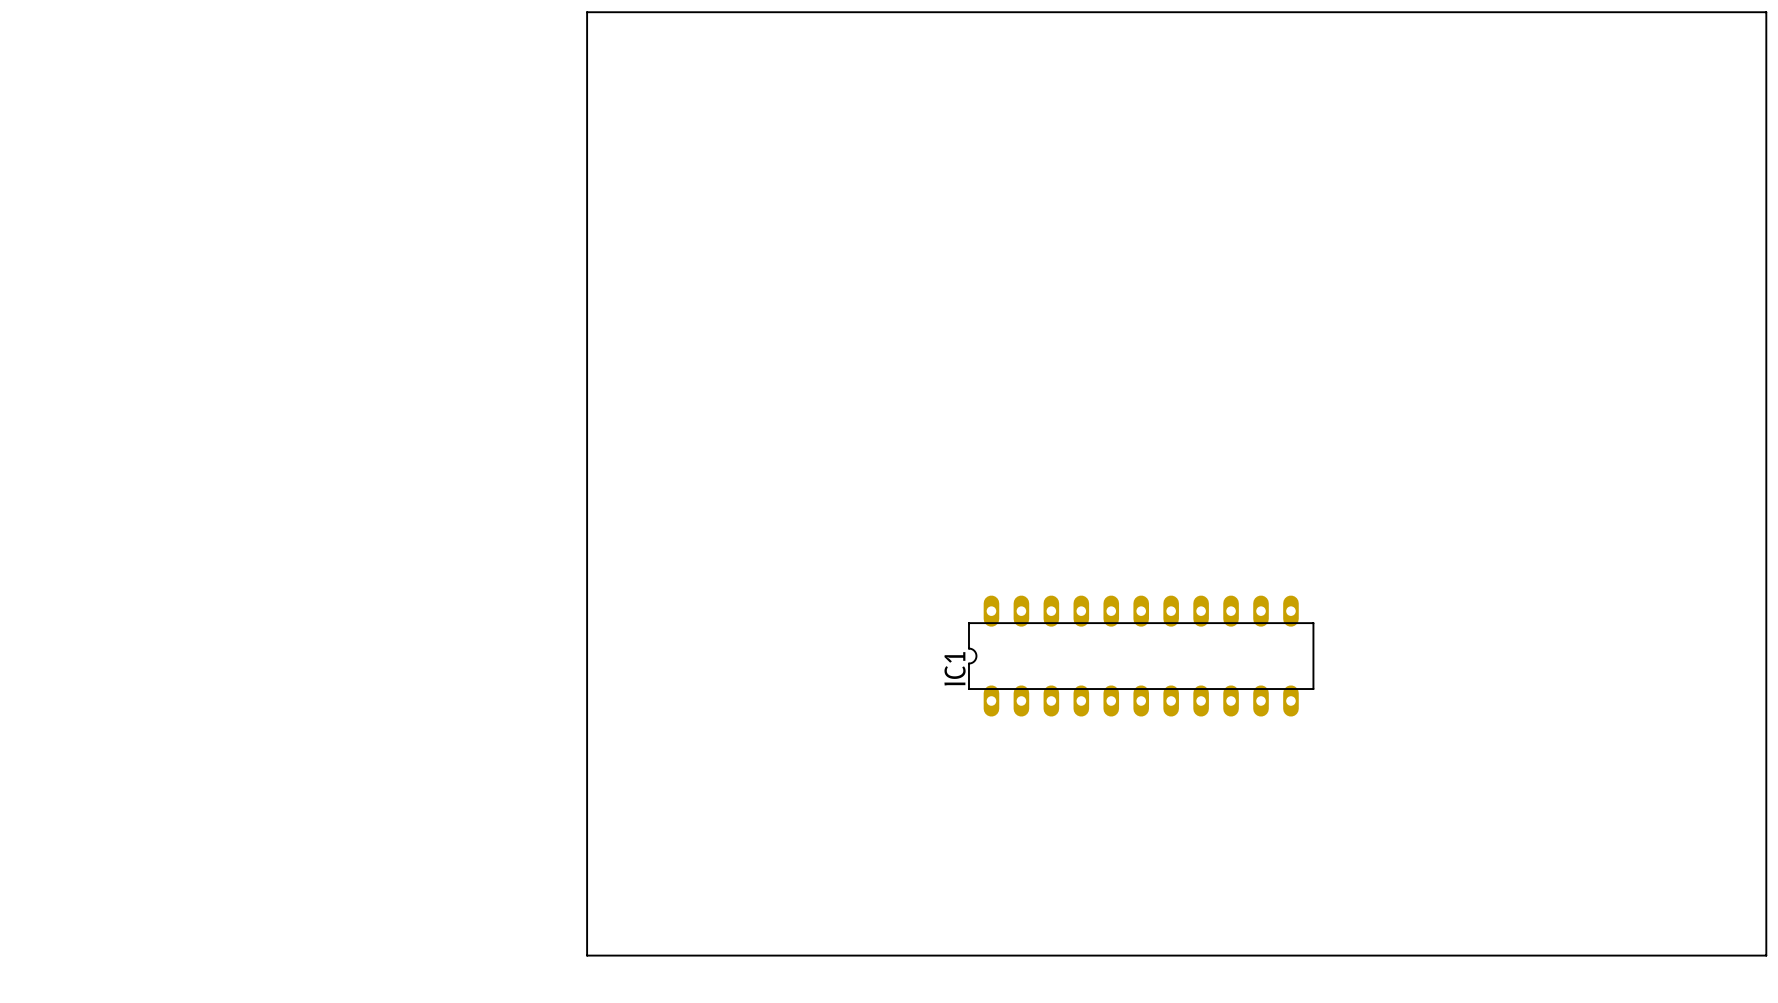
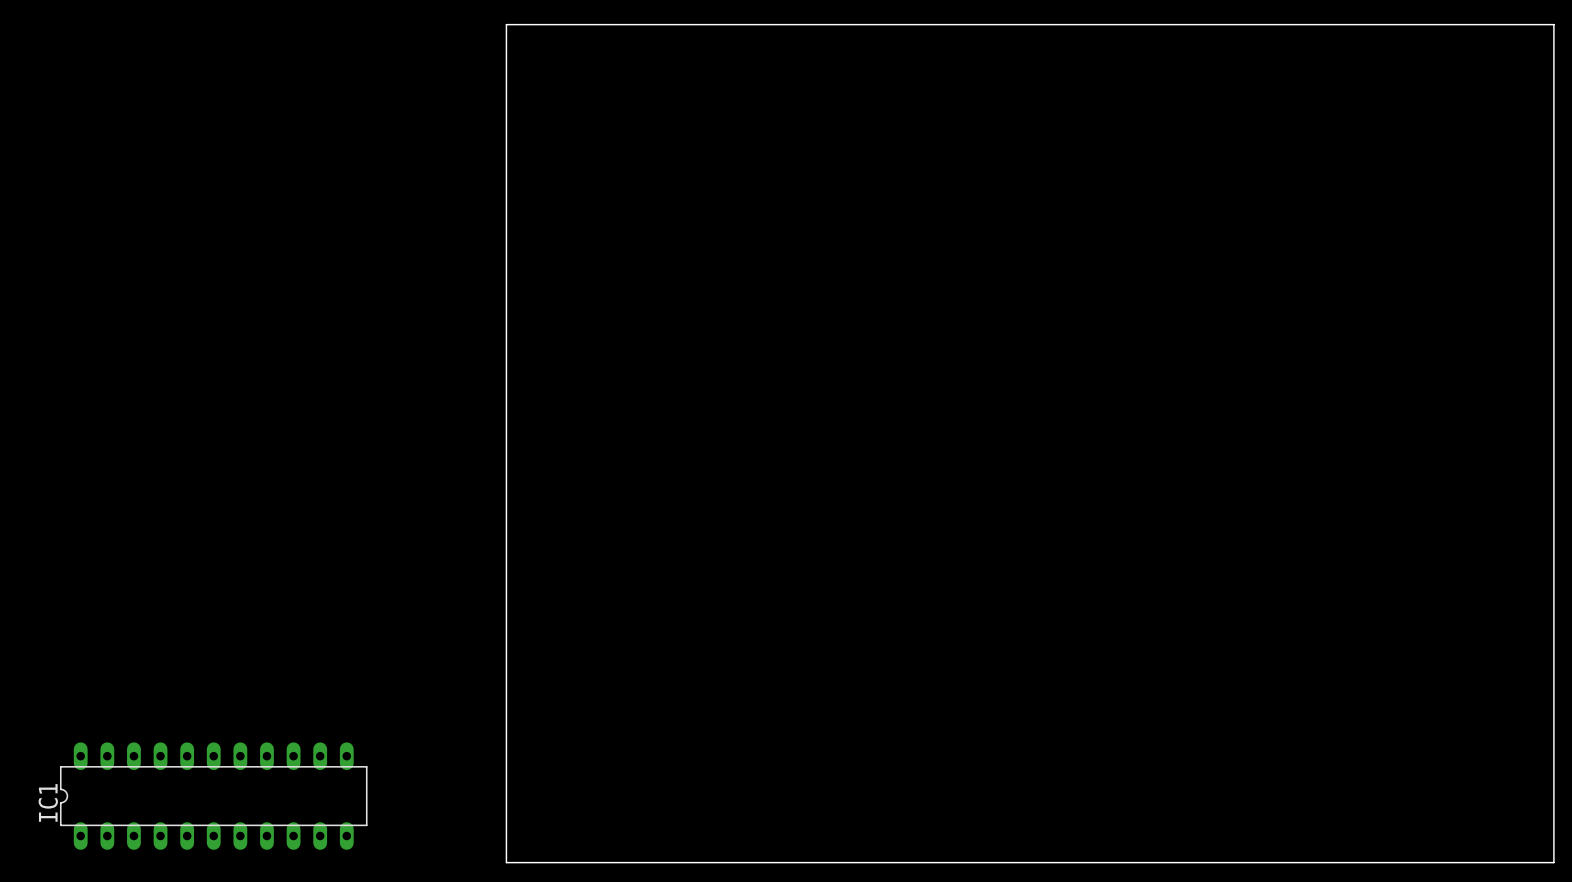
IC1 position: (1141, 656) -> (213, 796)

